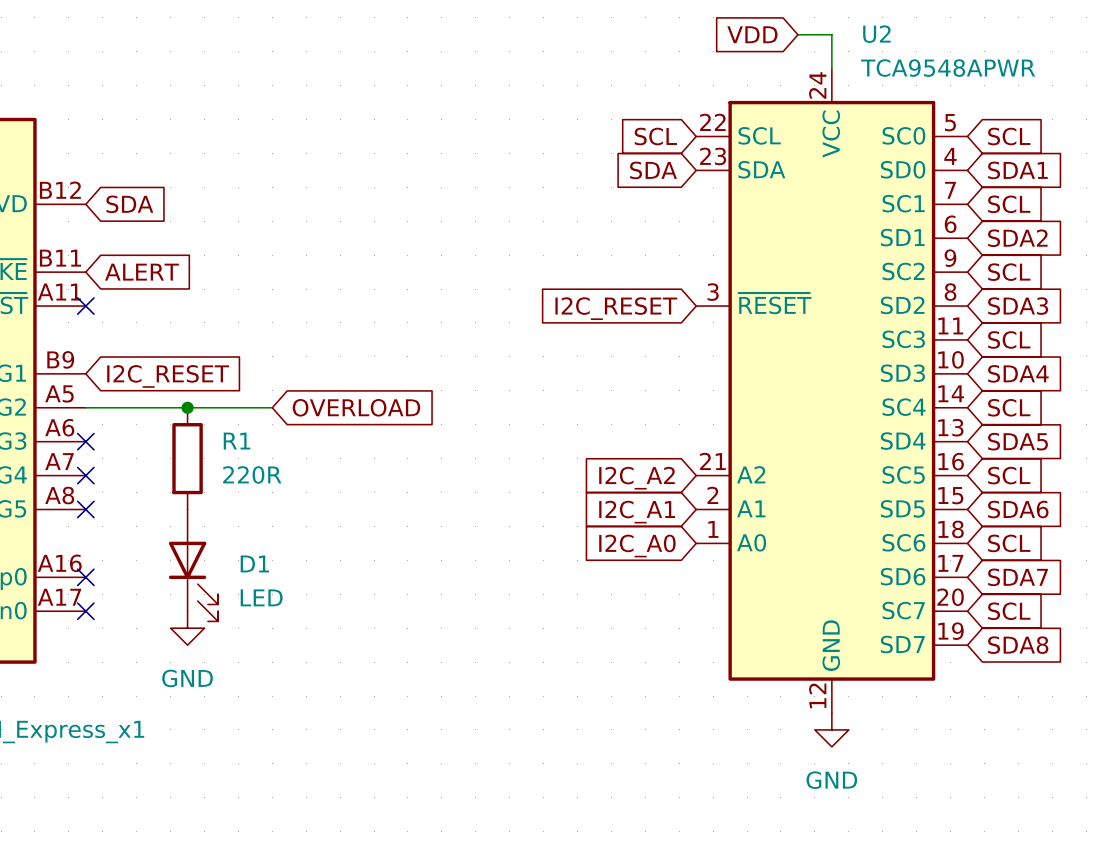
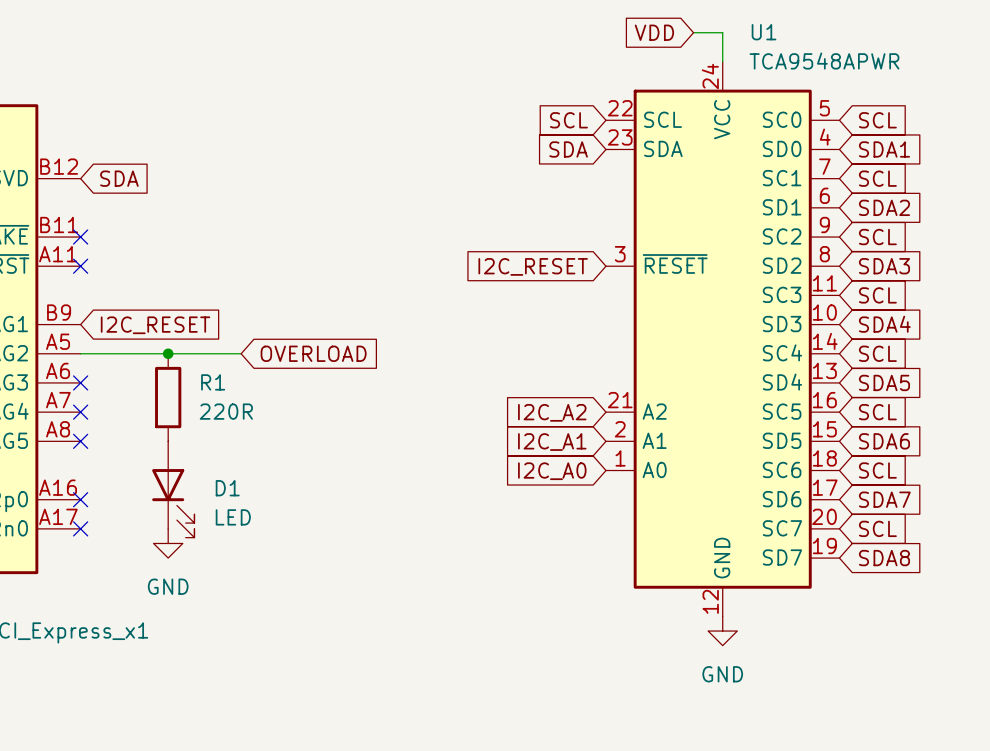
U2 name: U2 (876, 34) -> U1 (764, 32)
no-connect mark: none -> (80, 237)
global label: ALERT (141, 272) -> none

